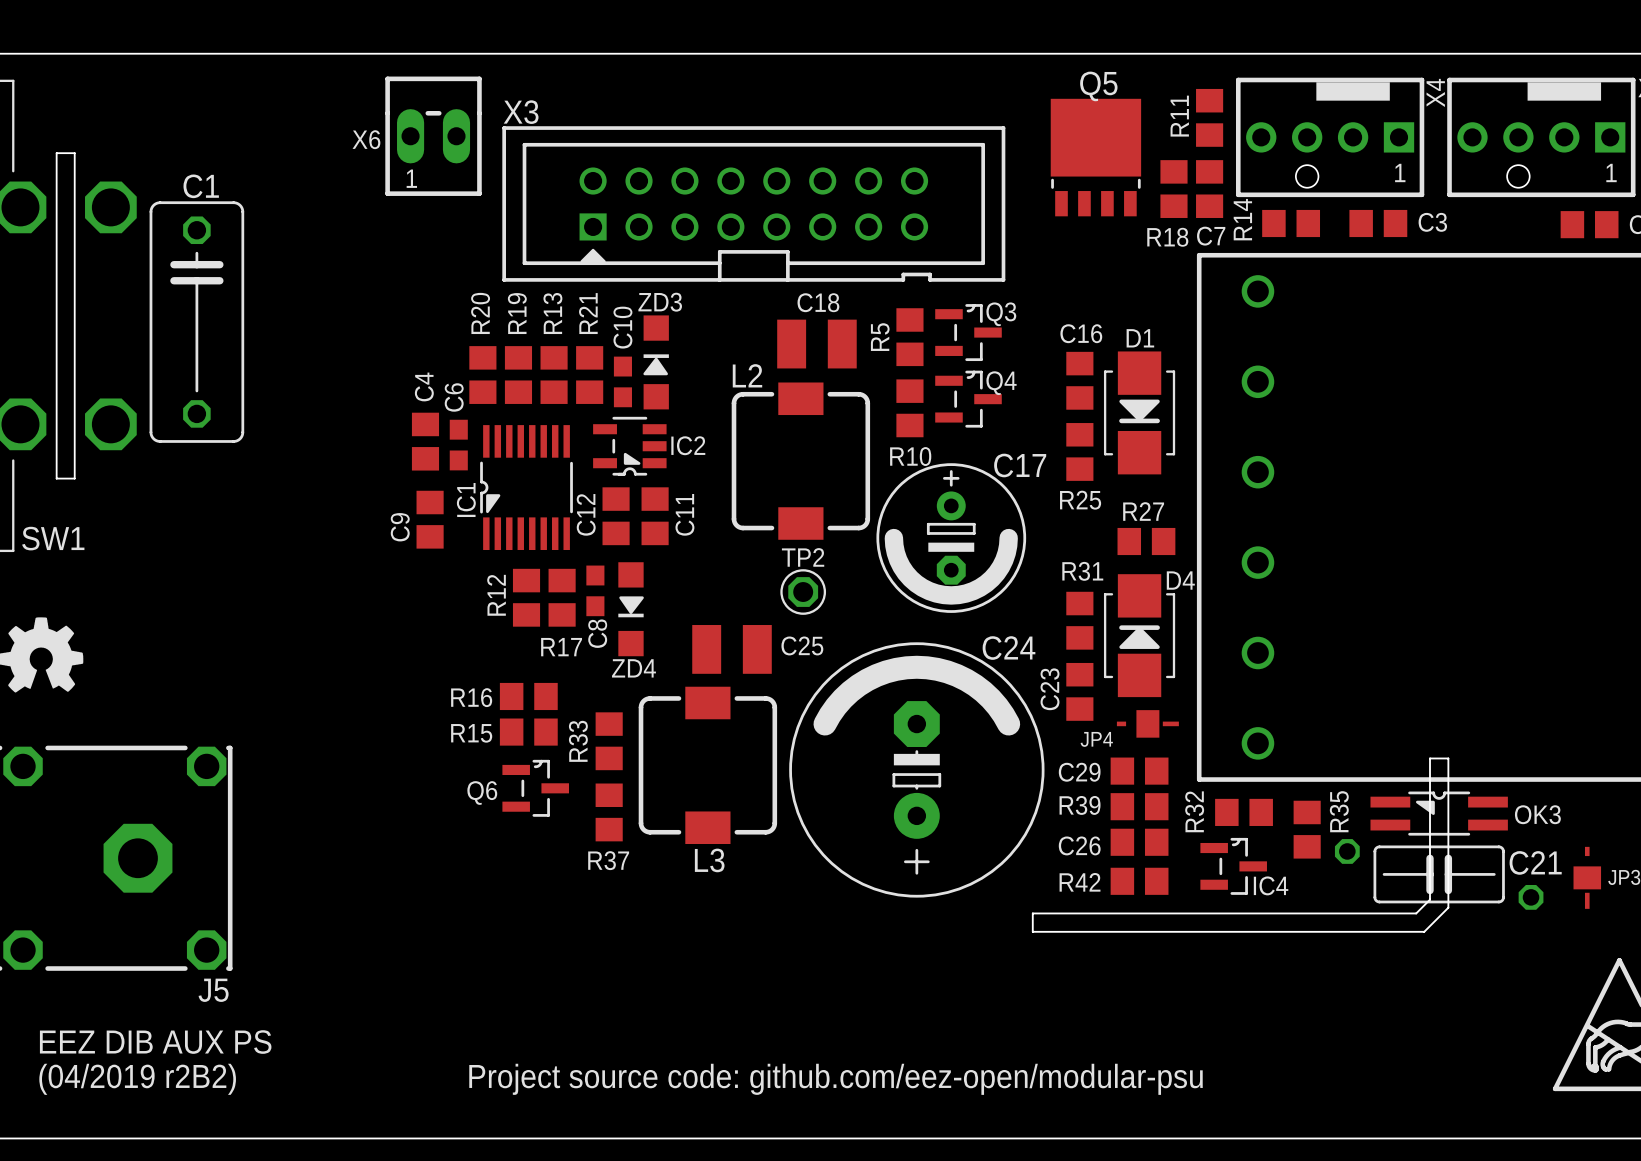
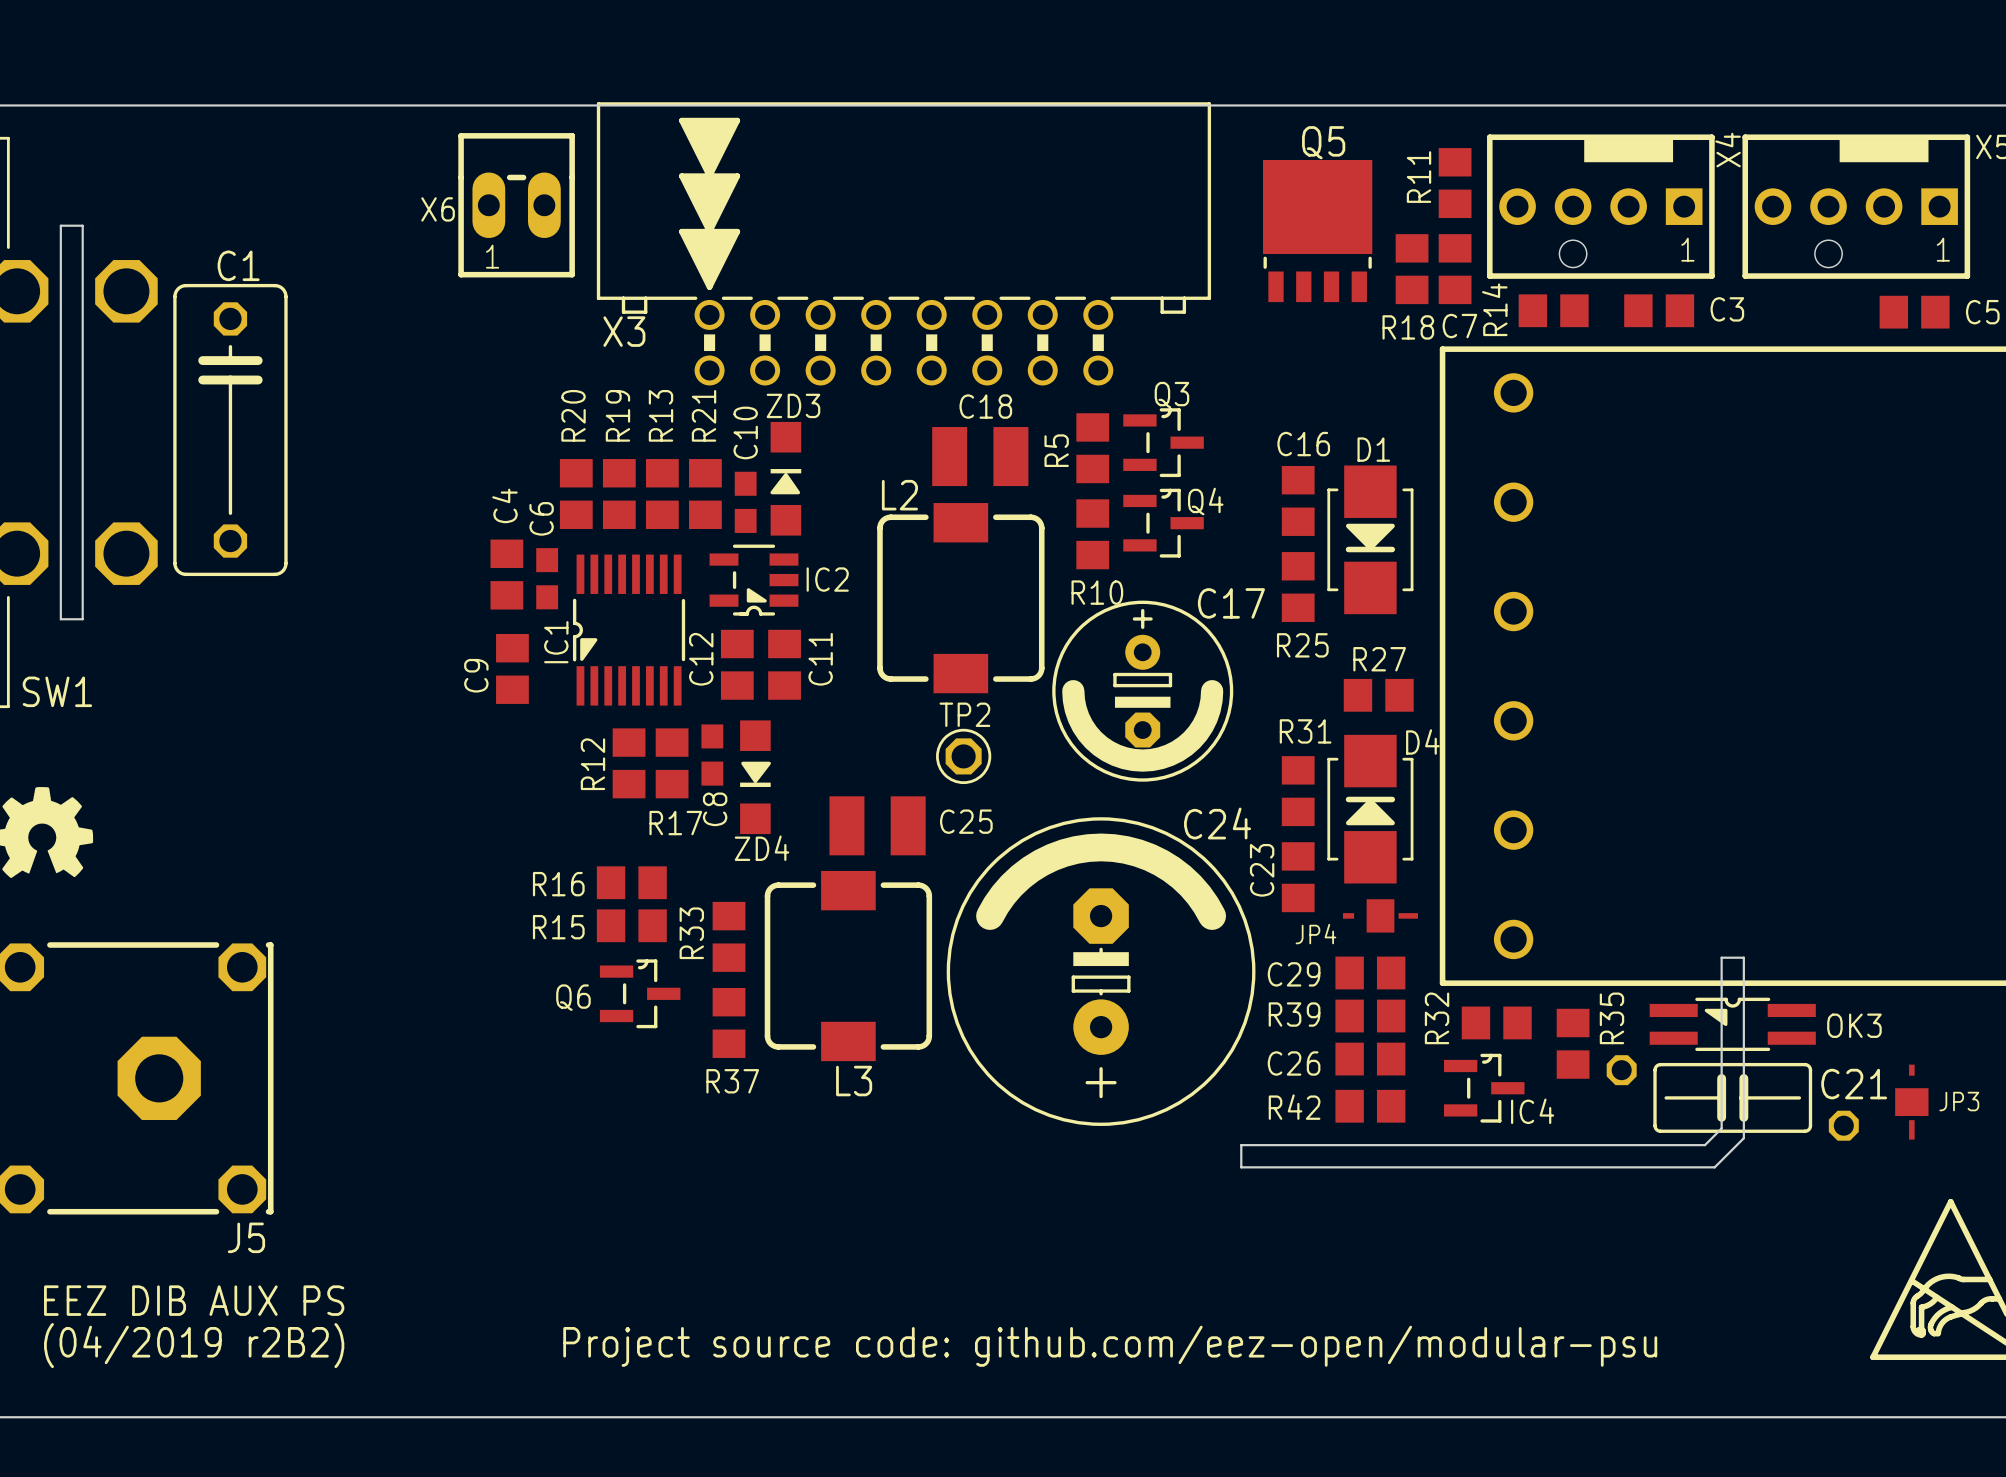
X3 name position: X3 (521, 112) -> X3 (624, 331)
X3 footprint: [502, 126, 1006, 282] -> [596, 102, 1212, 386]
Q3 name position: Q3 (1001, 314) -> Q3 (1171, 395)

